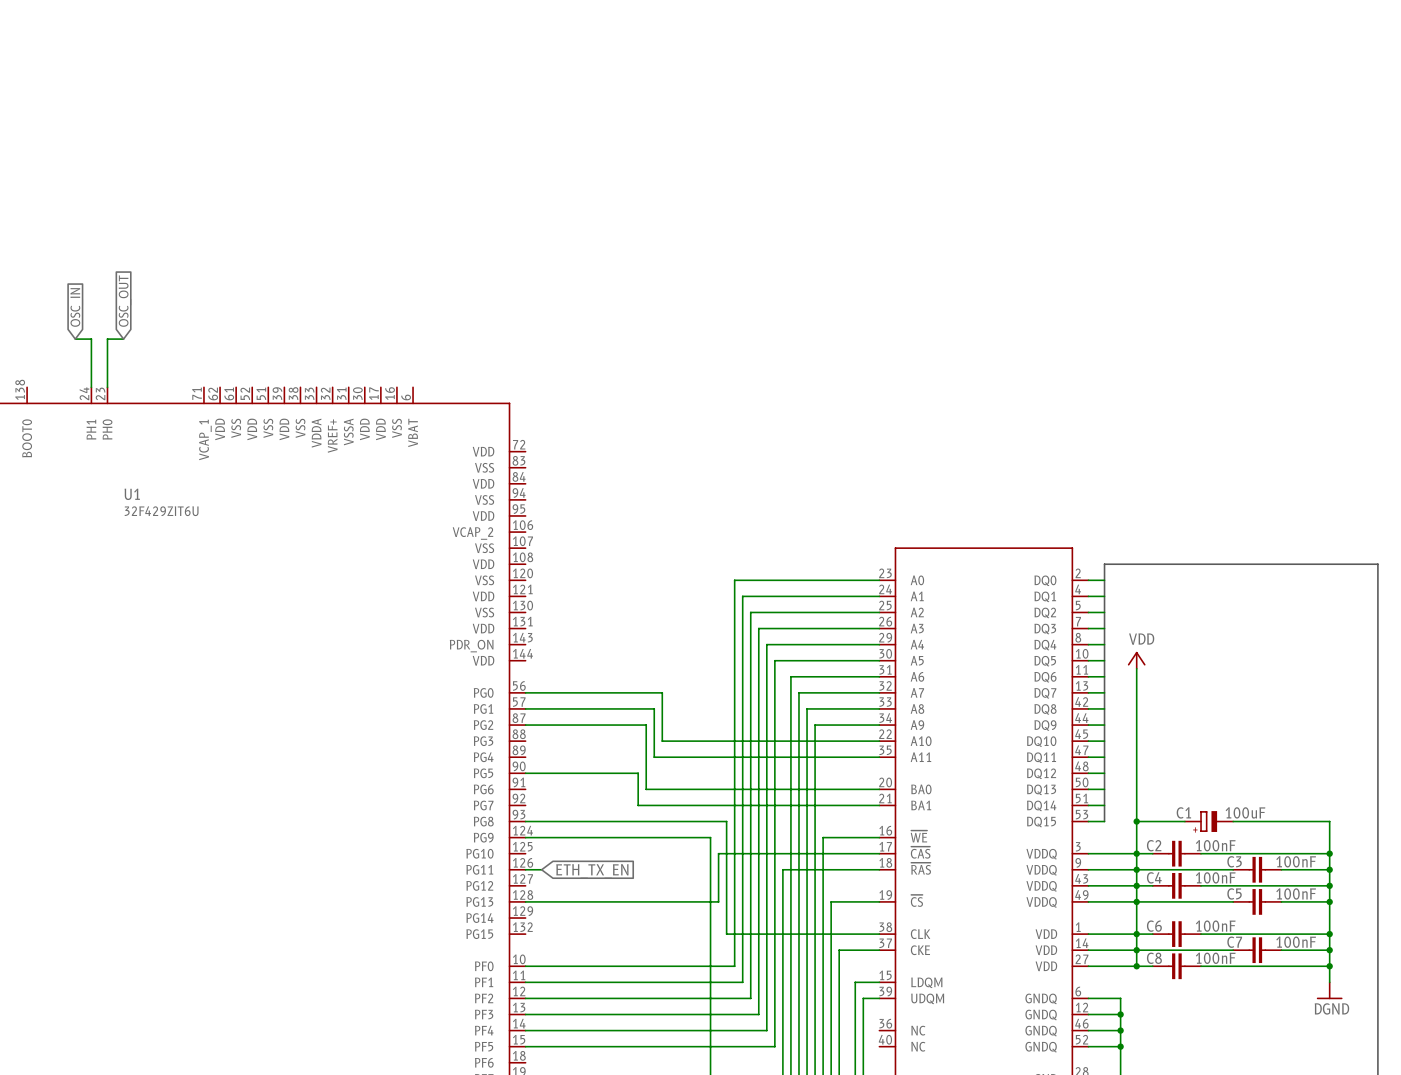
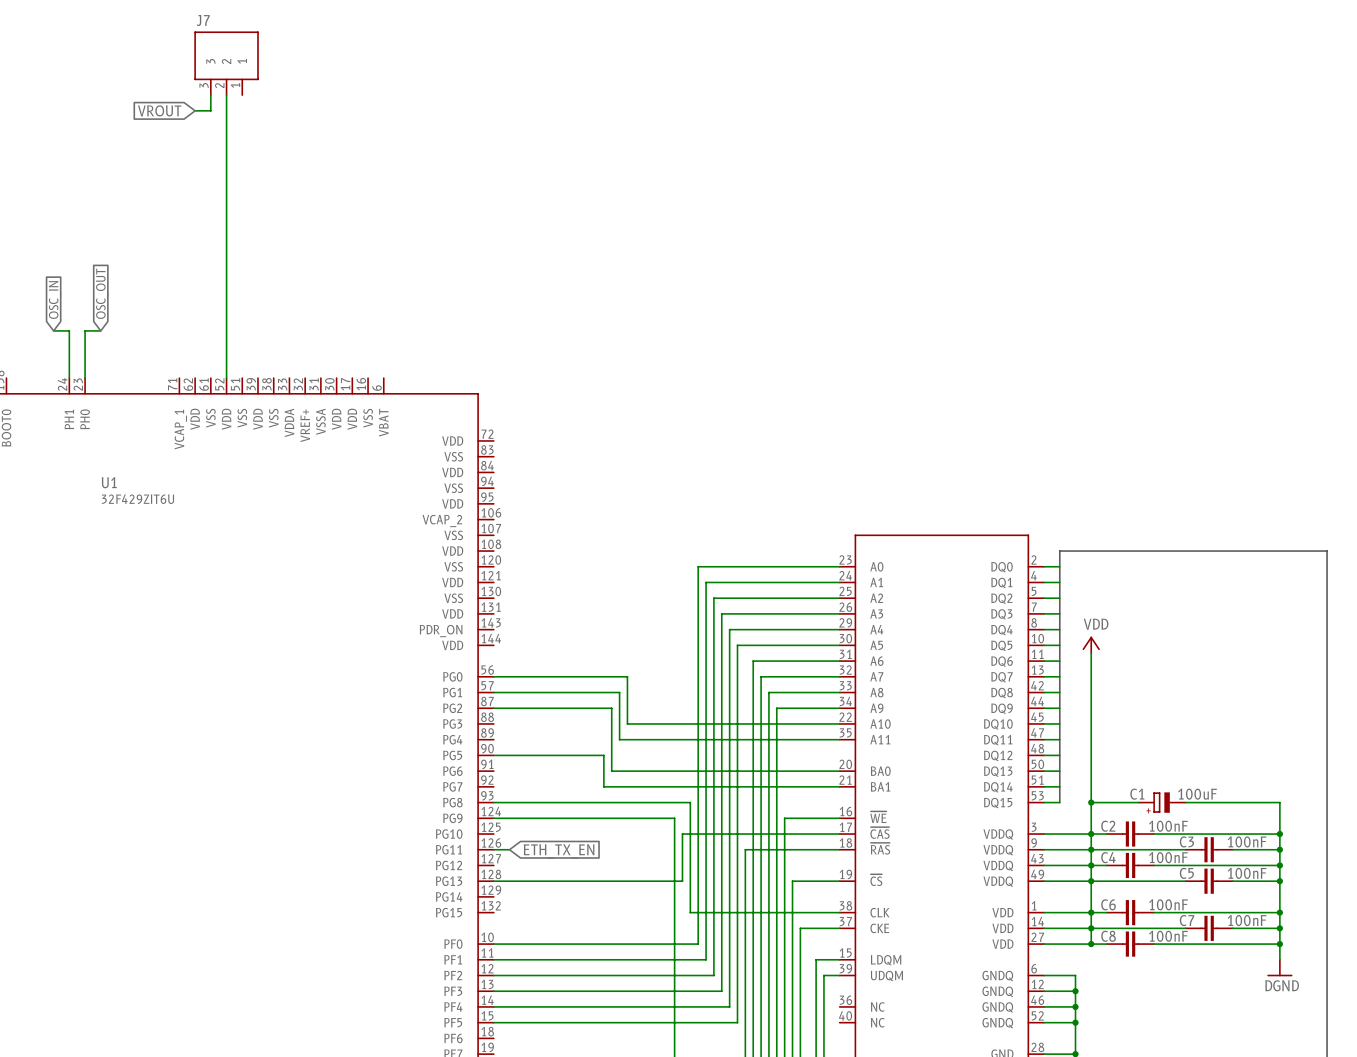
J7: none -> (226, 63)
wire: none -> (210, 95) (210, 110) (195, 110)
wire: none -> (226, 95) (226, 378)
global label: none -> VROUT (159, 110)

